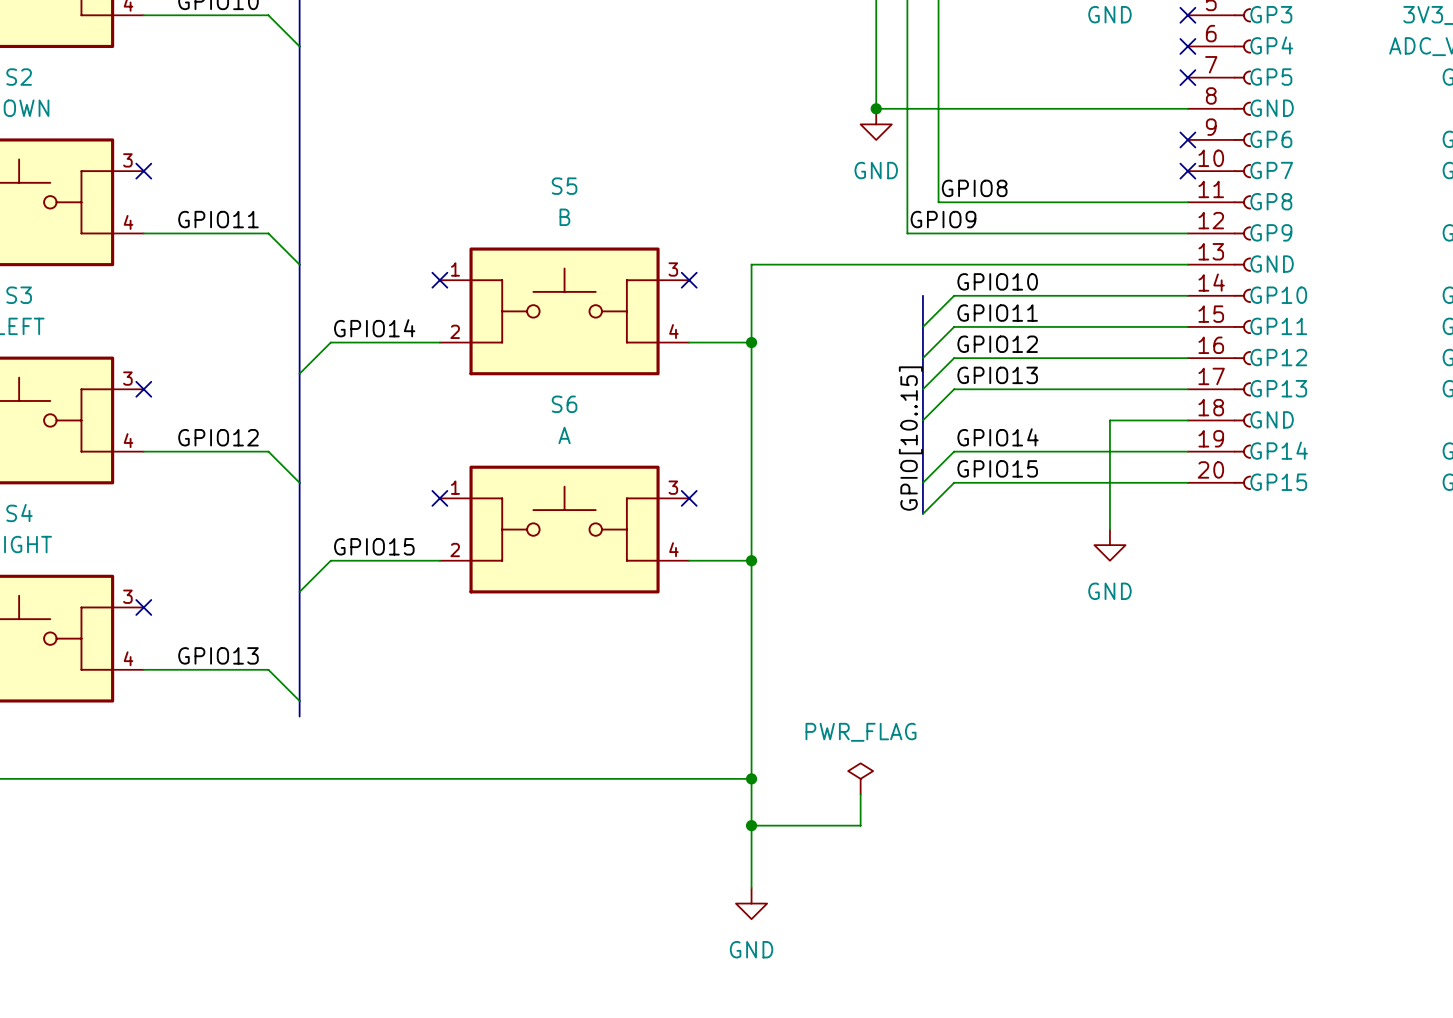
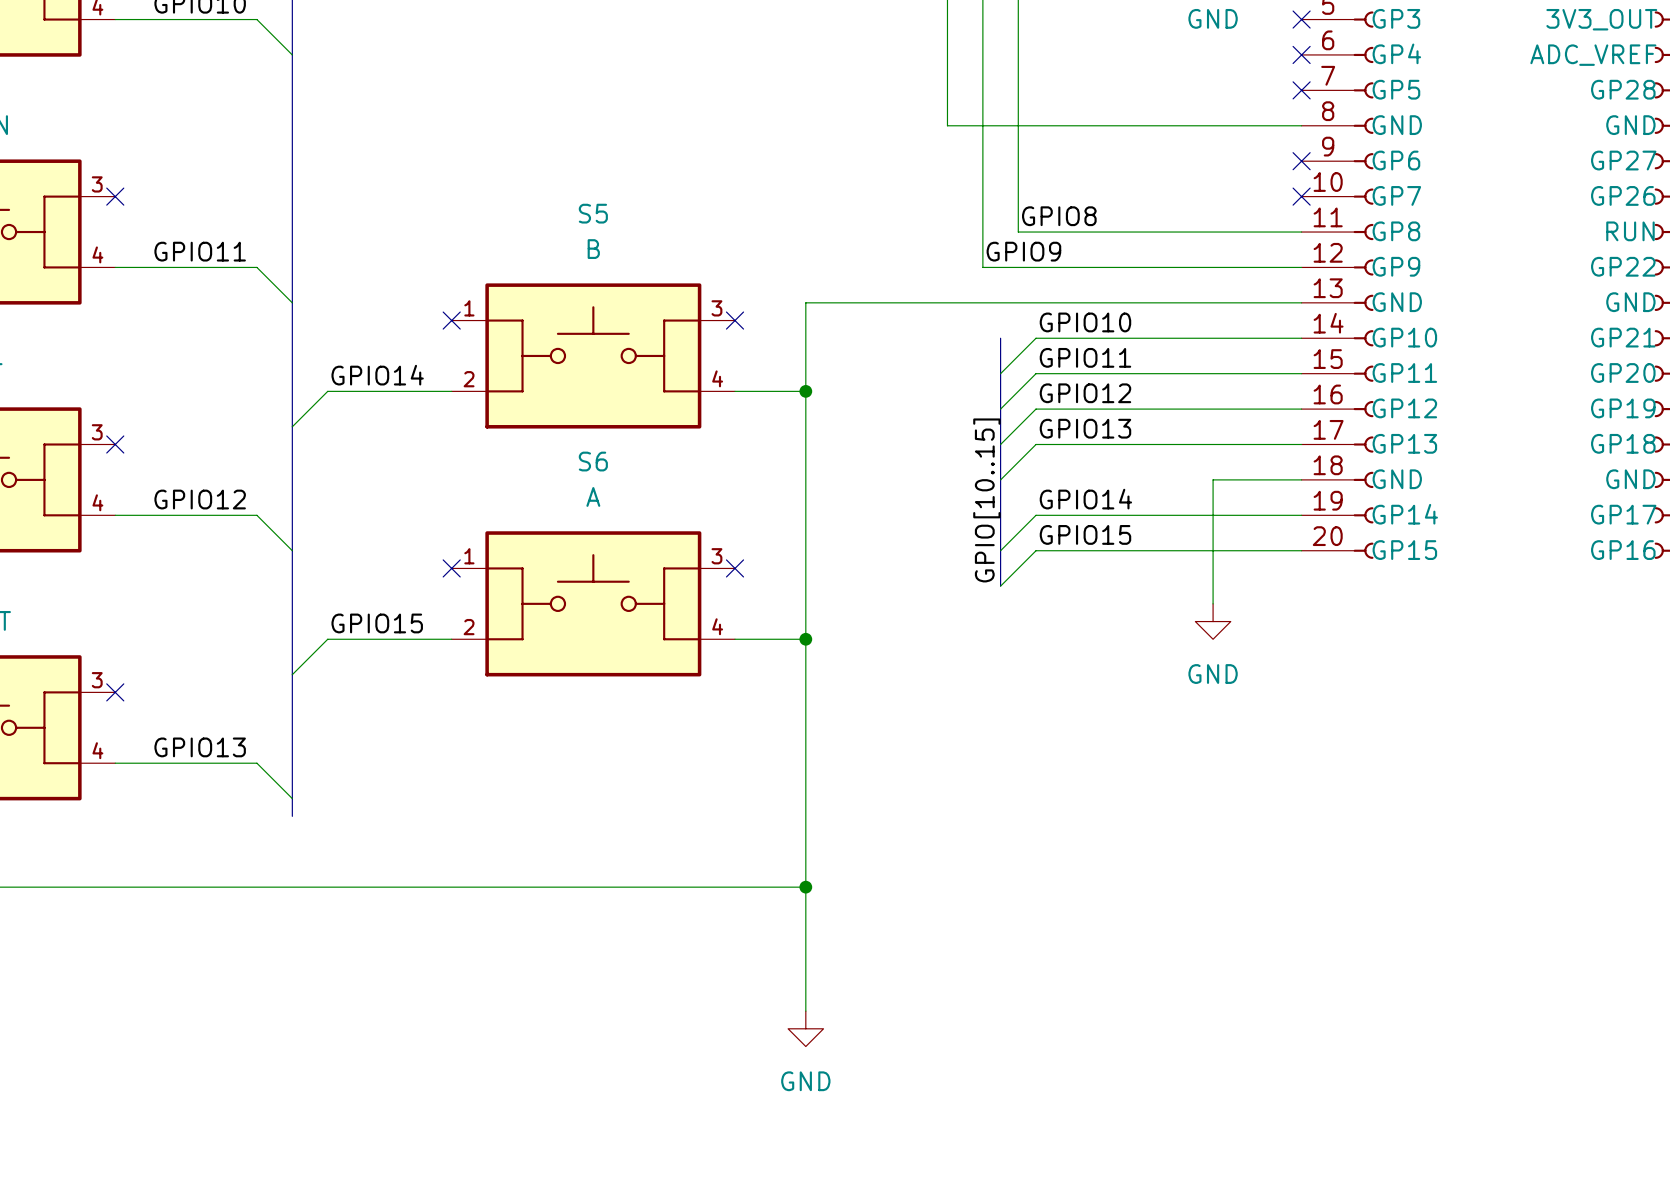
junction: (876, 108) -> none
power symbol: GND (876, 124) -> none
power symbol: PWR_FLAG (860, 778) -> none
wire: (860, 794) (860, 825) (751, 825) -> none
junction: (751, 825) -> none

